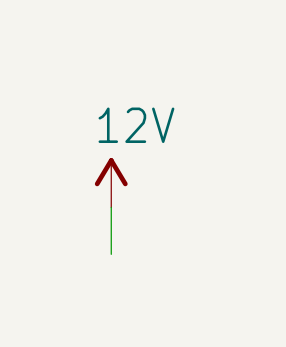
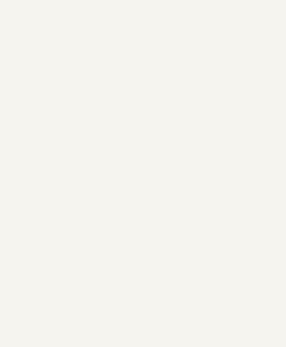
power symbol: 12V (111, 182) -> none
wire: (111, 207) (111, 254) -> none

